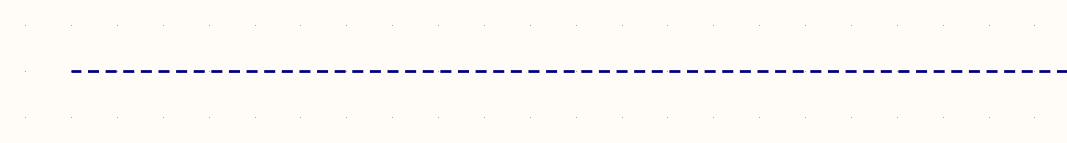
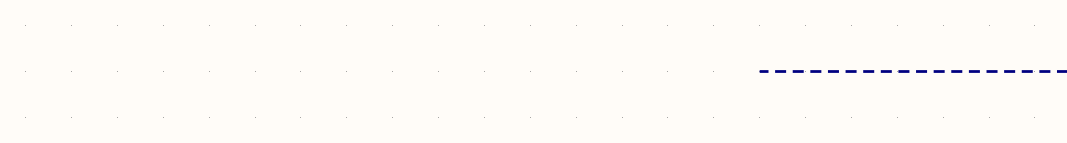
line: (71, 71) (759, 71) -> none

